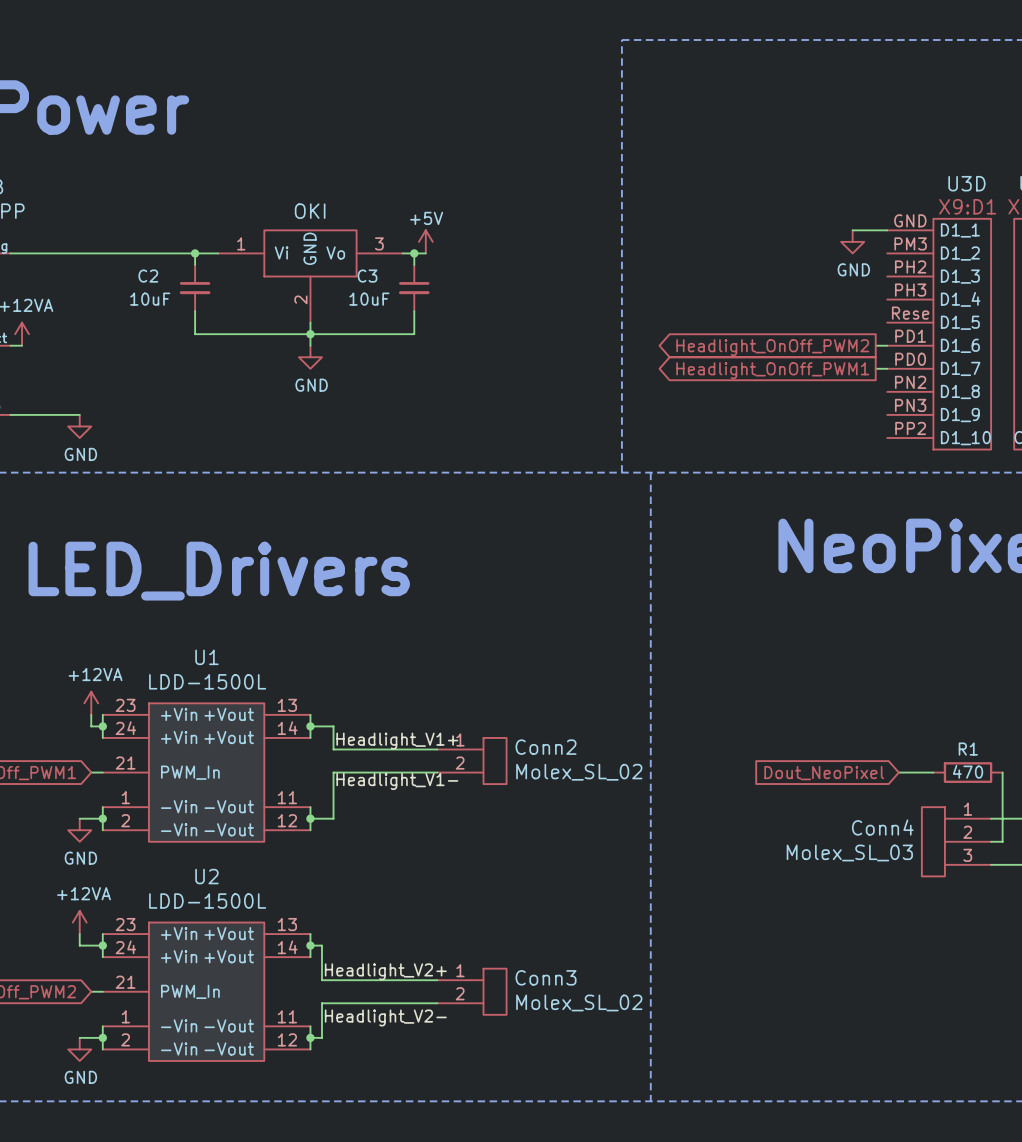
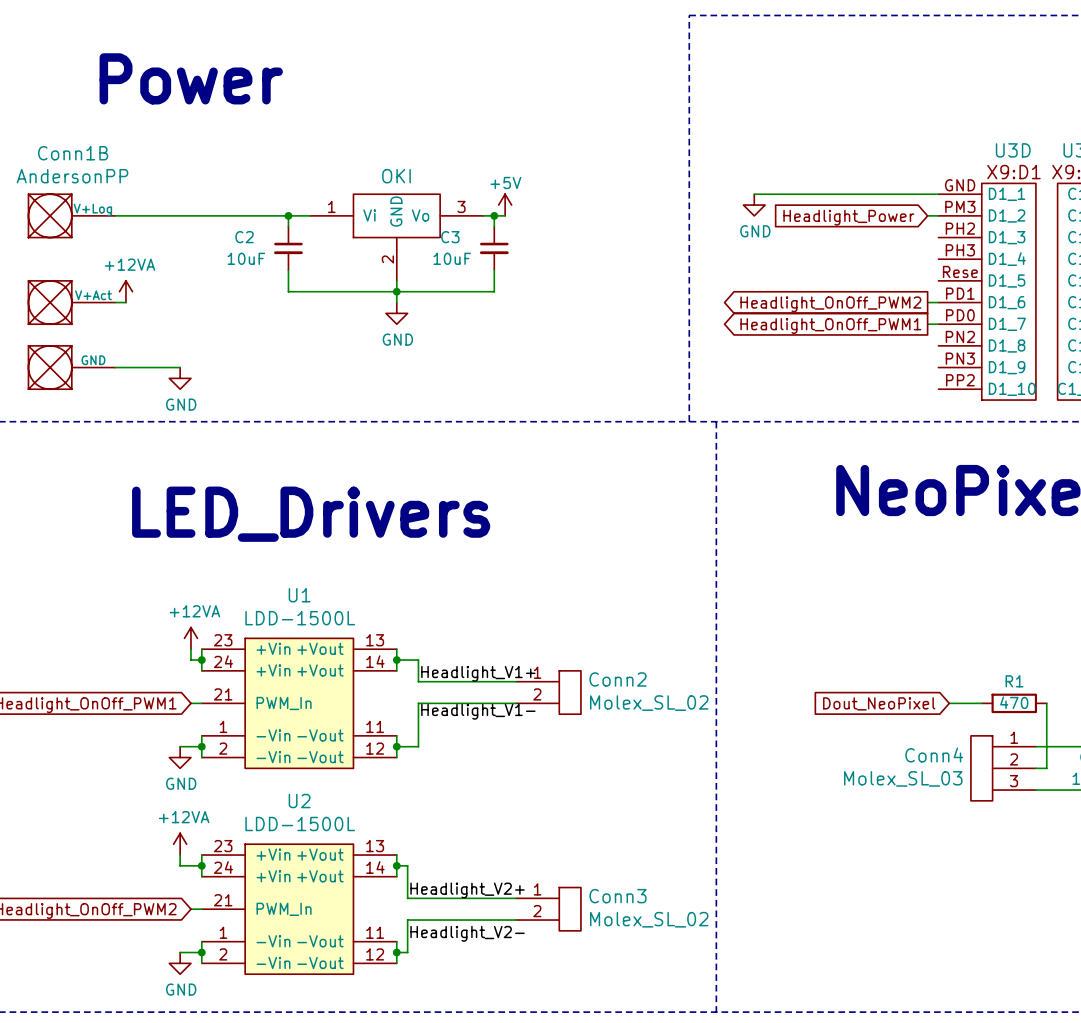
wire: none -> (754, 194) (905, 194)
power symbol position: GND (852, 241) -> GND (754, 205)
wire: none -> (927, 215) (938, 215)
global label: none -> Headlight_Power (848, 217)

